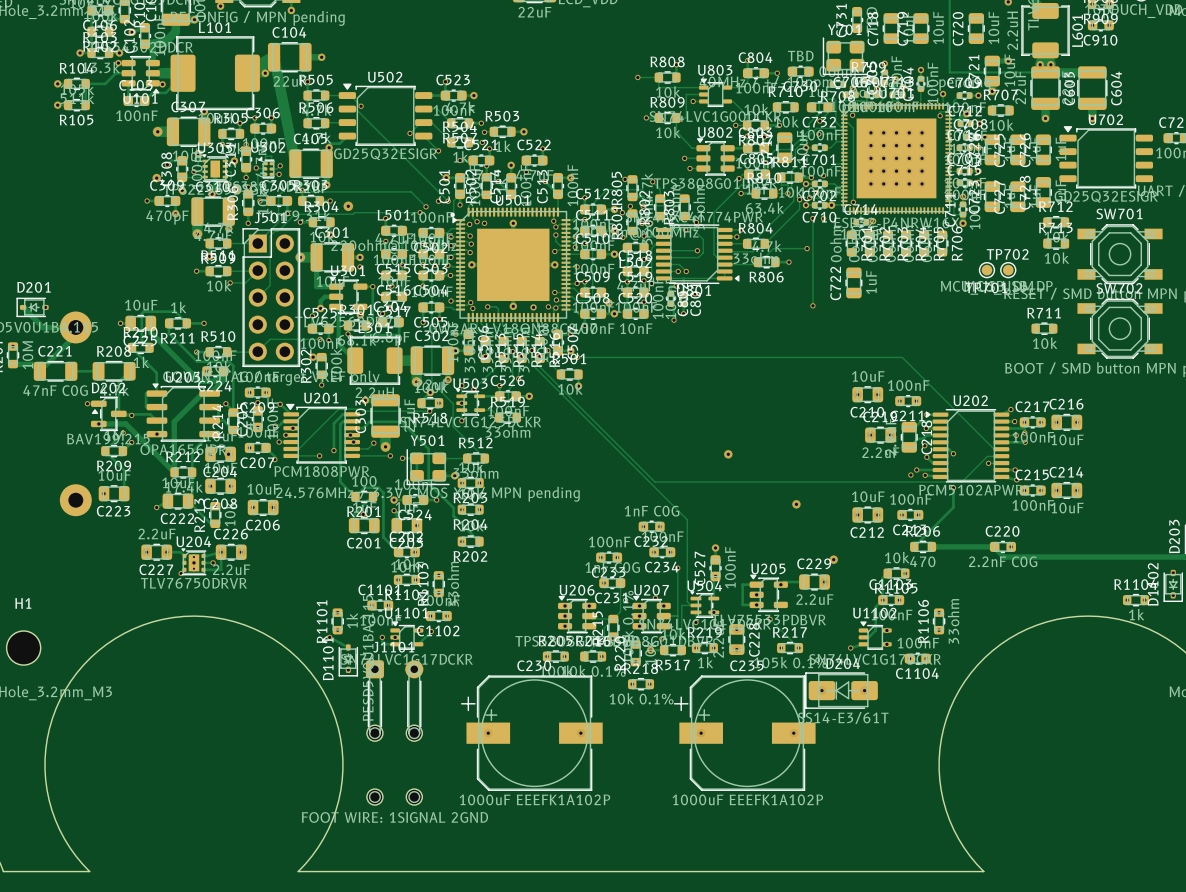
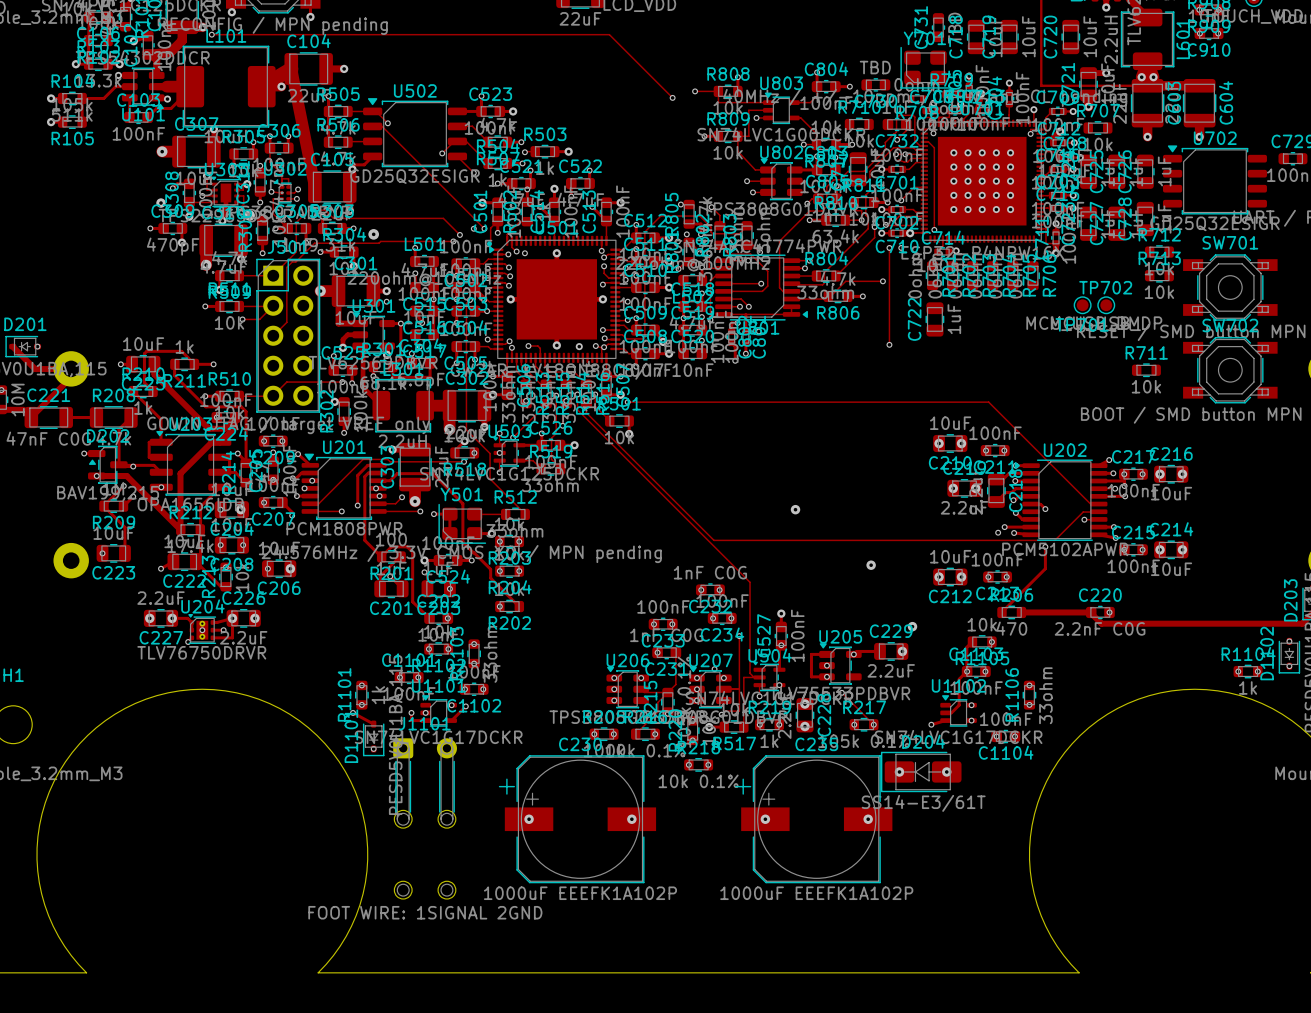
track: none -> (211, 34) (609, 34) (672, 97)
via: none -> (211, 34)
via: none -> (672, 97)
via: none -> (905, 154)
track: none -> (924, 158) (911, 158) (907, 161) (898, 159)

